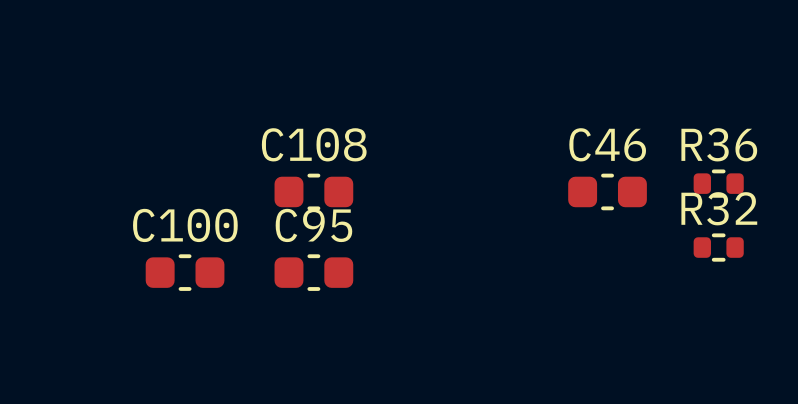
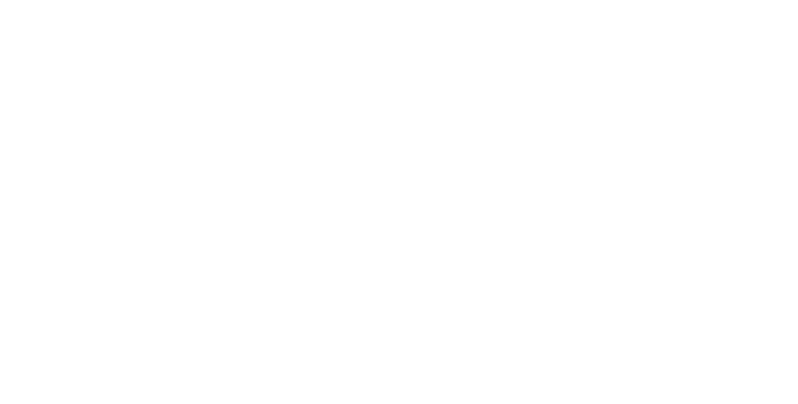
R36: (718, 183) -> none
C108: (313, 191) -> none
C46: (607, 191) -> none
R32: (718, 247) -> none
C100: (185, 272) -> none
C95: (313, 272) -> none

